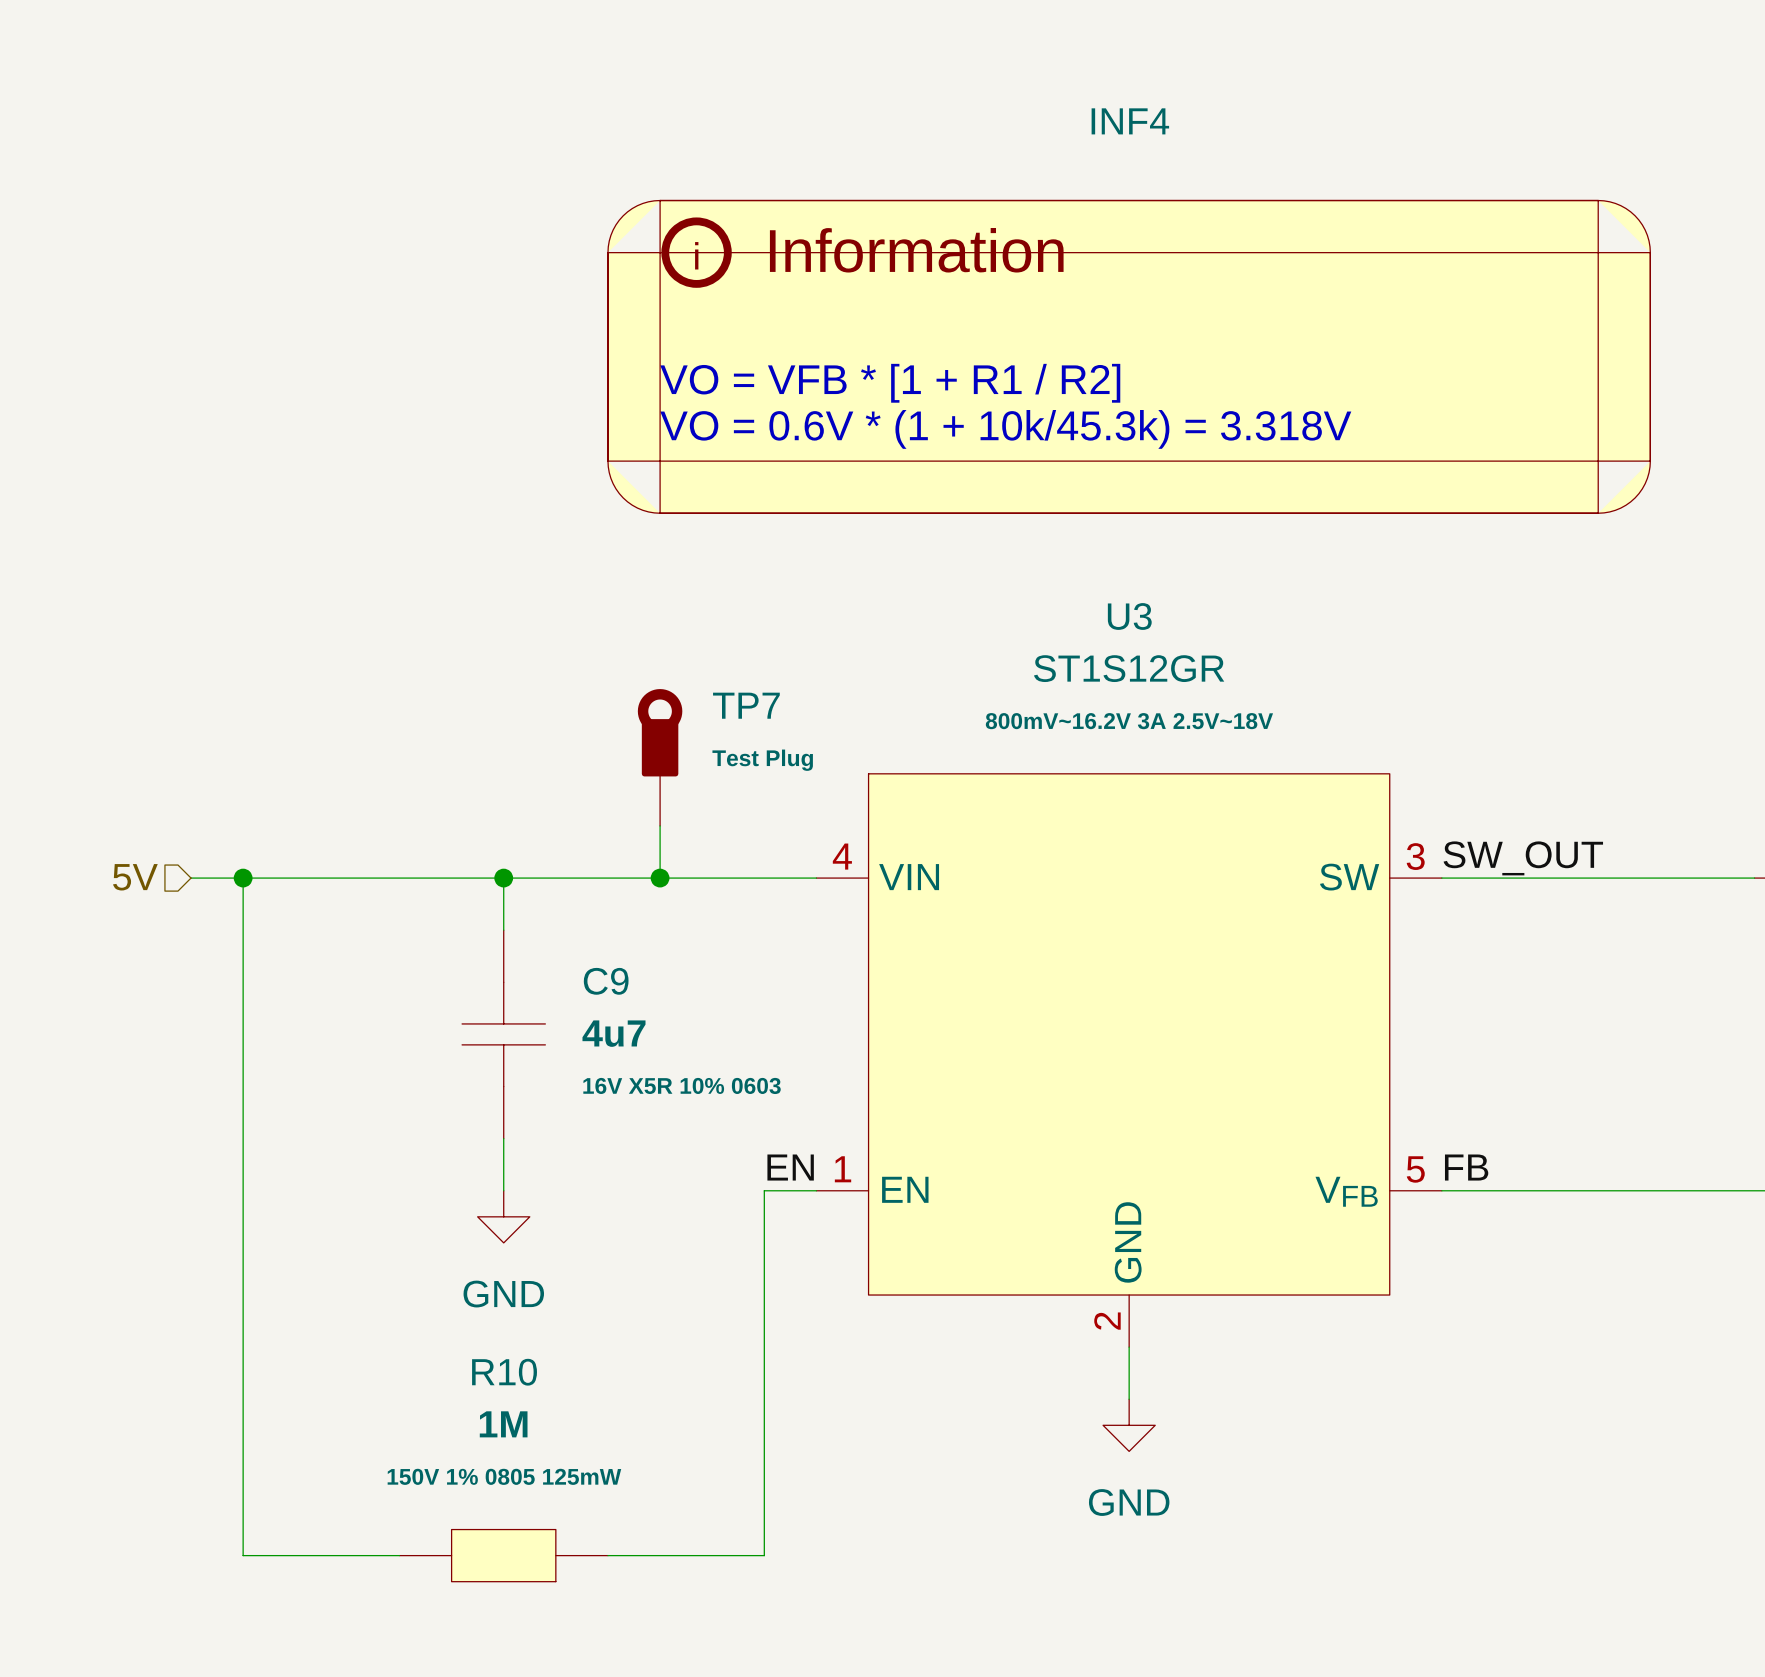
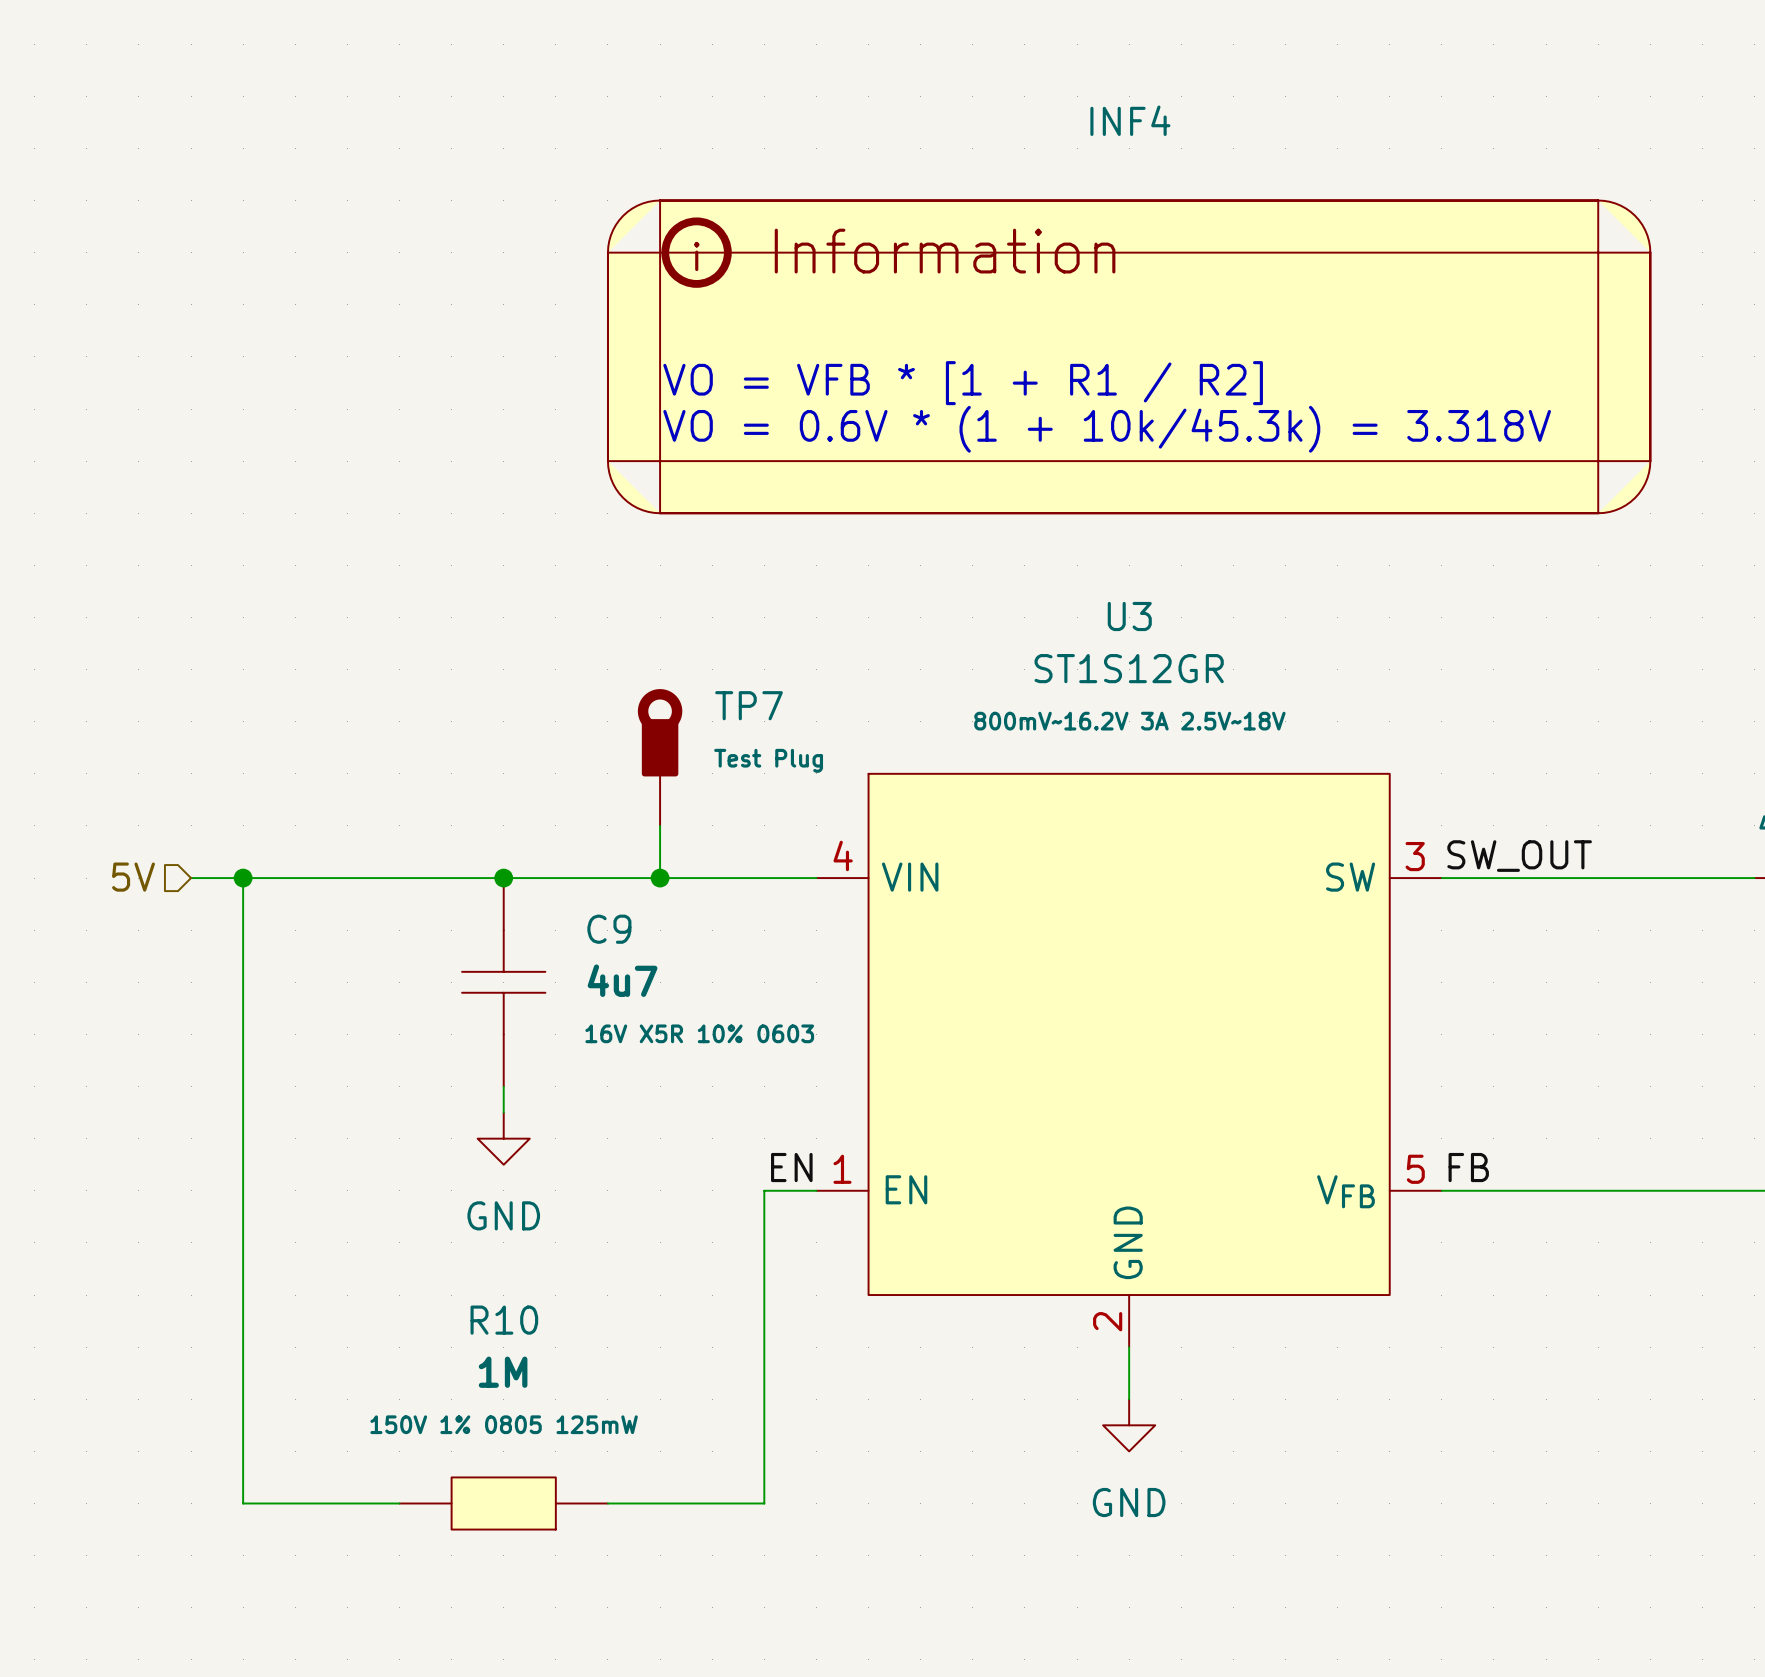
C9 position: (503, 1034) -> (503, 982)
wire: (503, 1138) (503, 1190) -> none
power symbol position: GND (503, 1216) -> GND (503, 1138)
wire: (243, 1503) (243, 1555) (399, 1555) -> (243, 1503) (399, 1503)
wire: (764, 1503) (764, 1555) (607, 1555) -> (764, 1503) (607, 1503)
R10 position: (503, 1555) -> (503, 1503)

